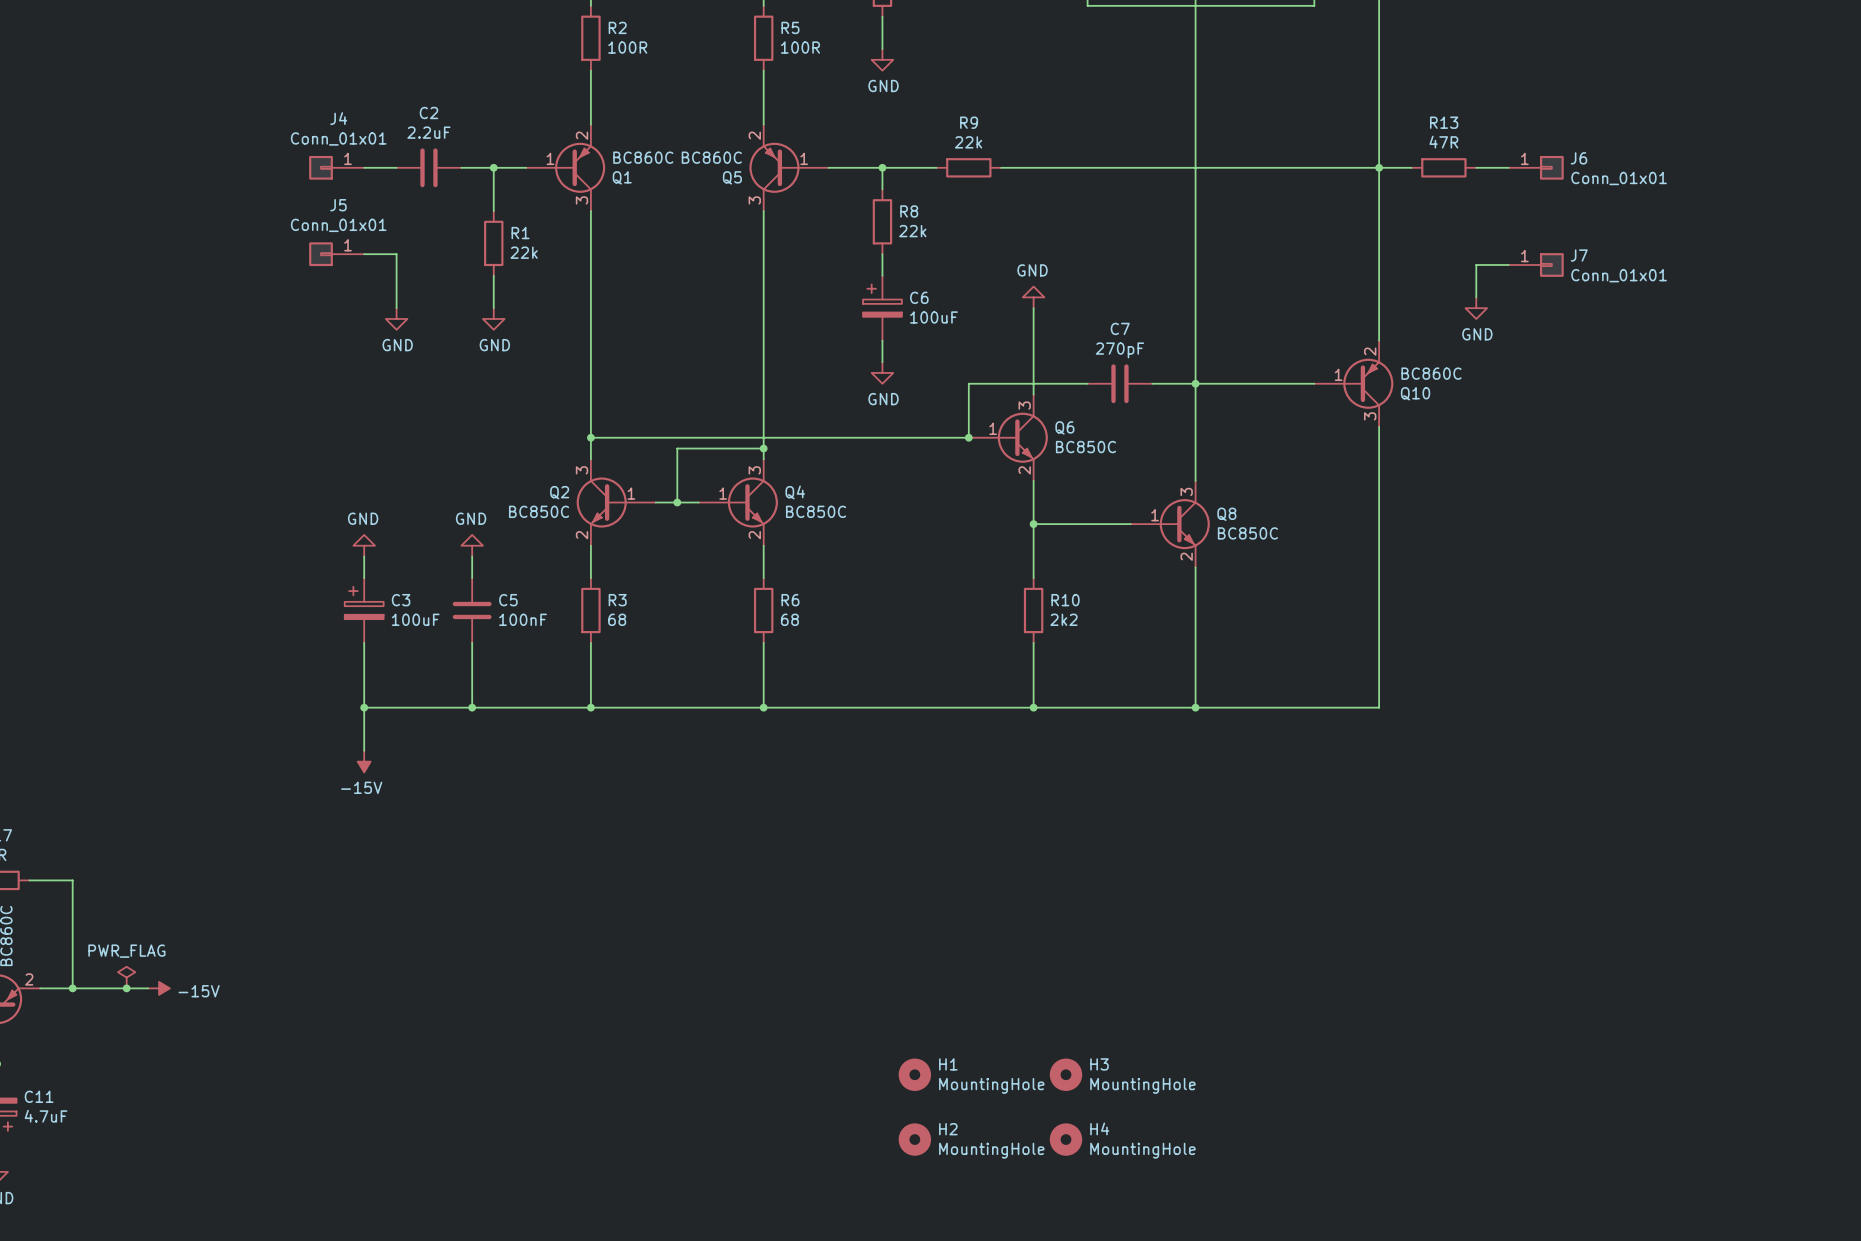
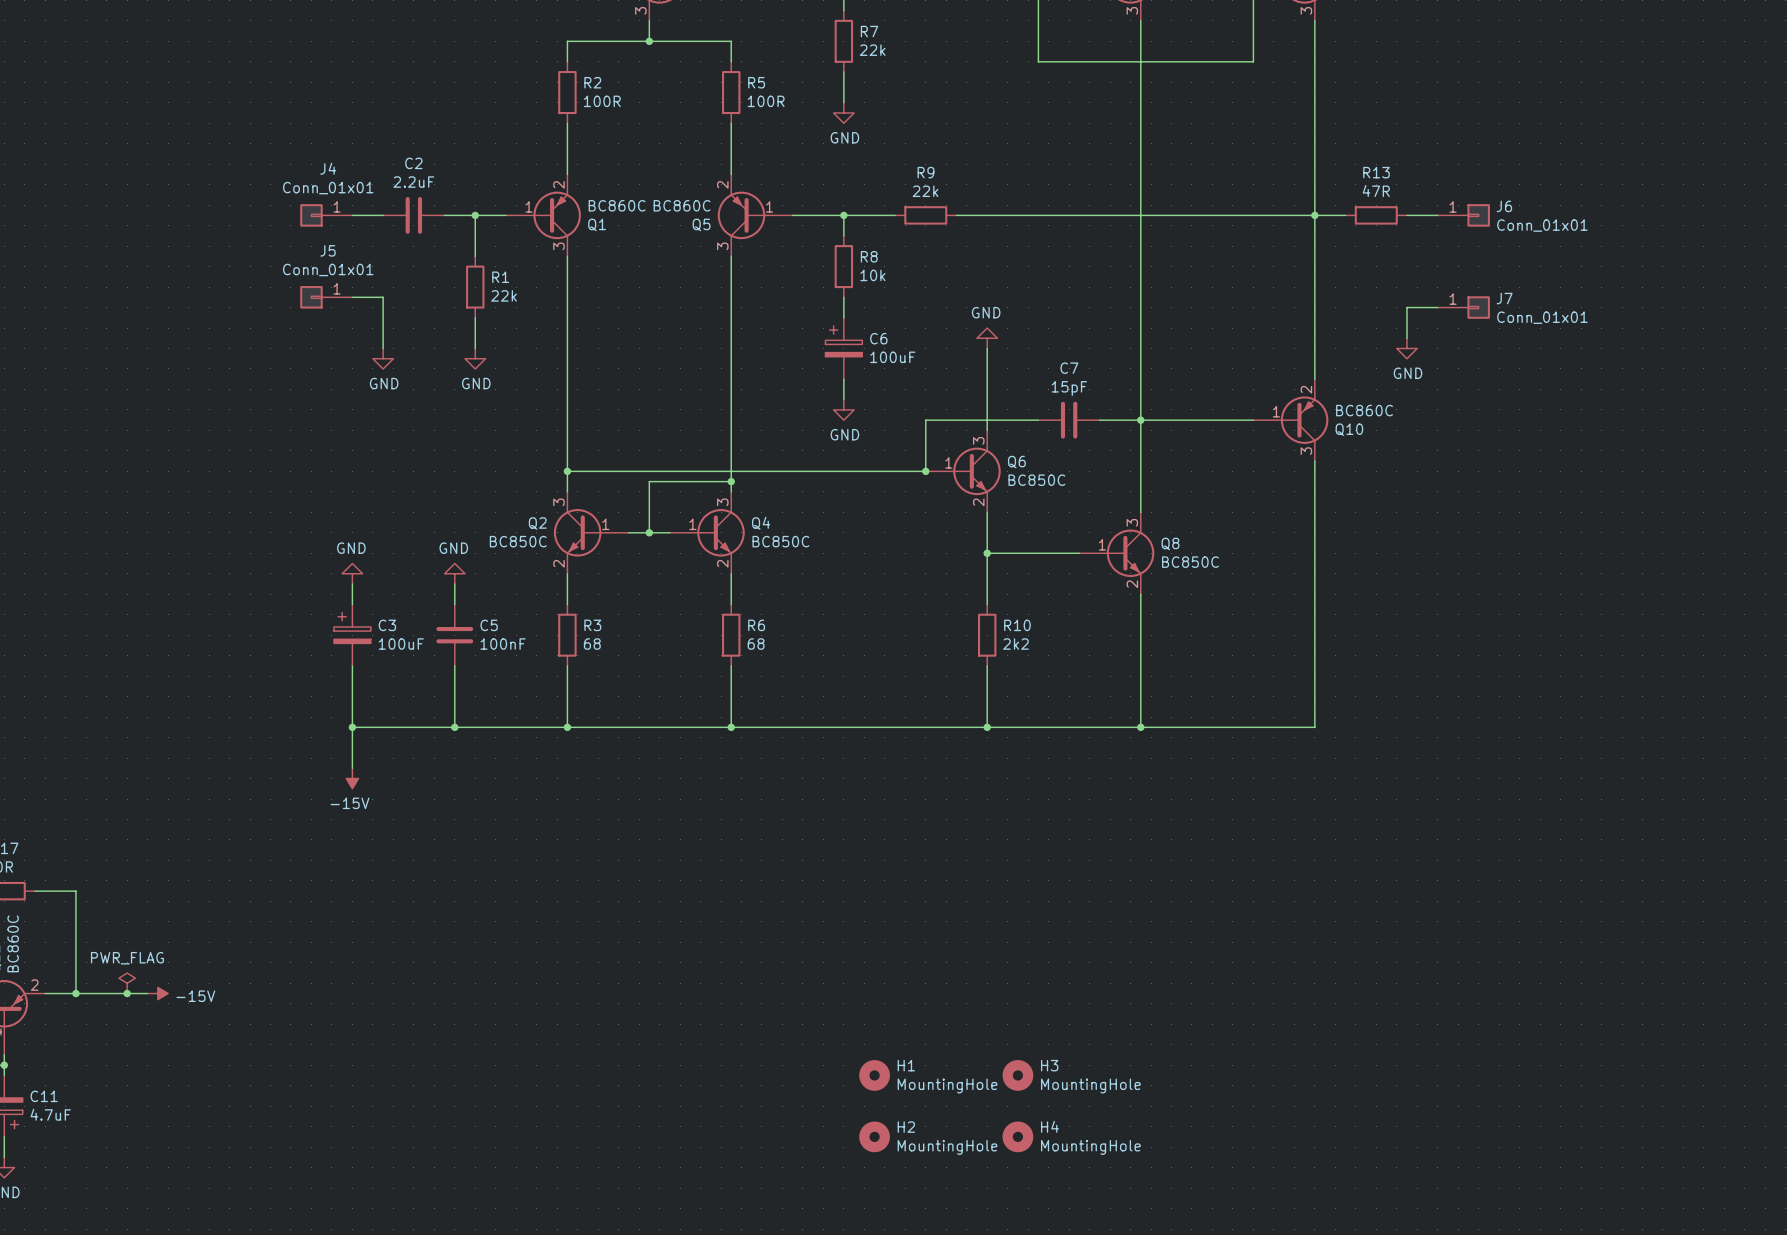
R8 value: 22k (912, 231) -> 10k (872, 275)
C7 value: 270pF (1119, 350) -> 15pF (1069, 388)

